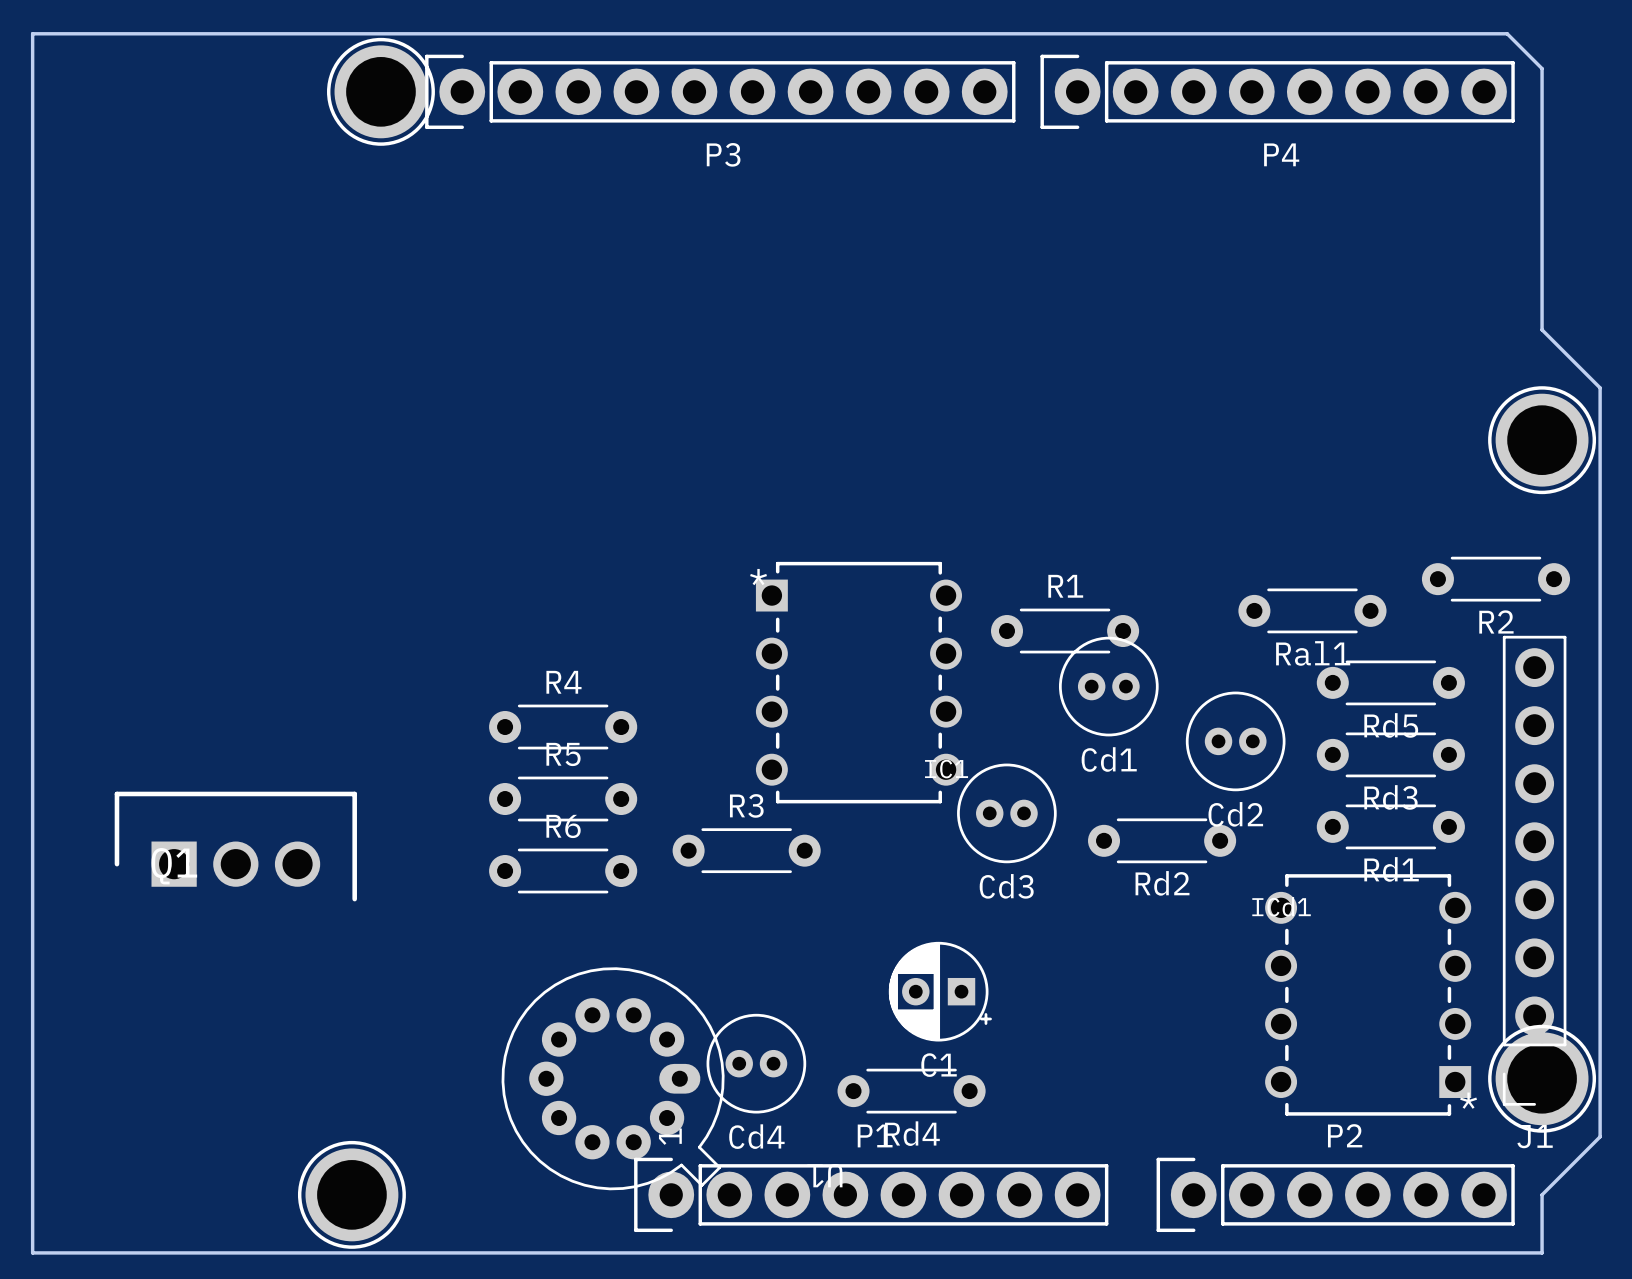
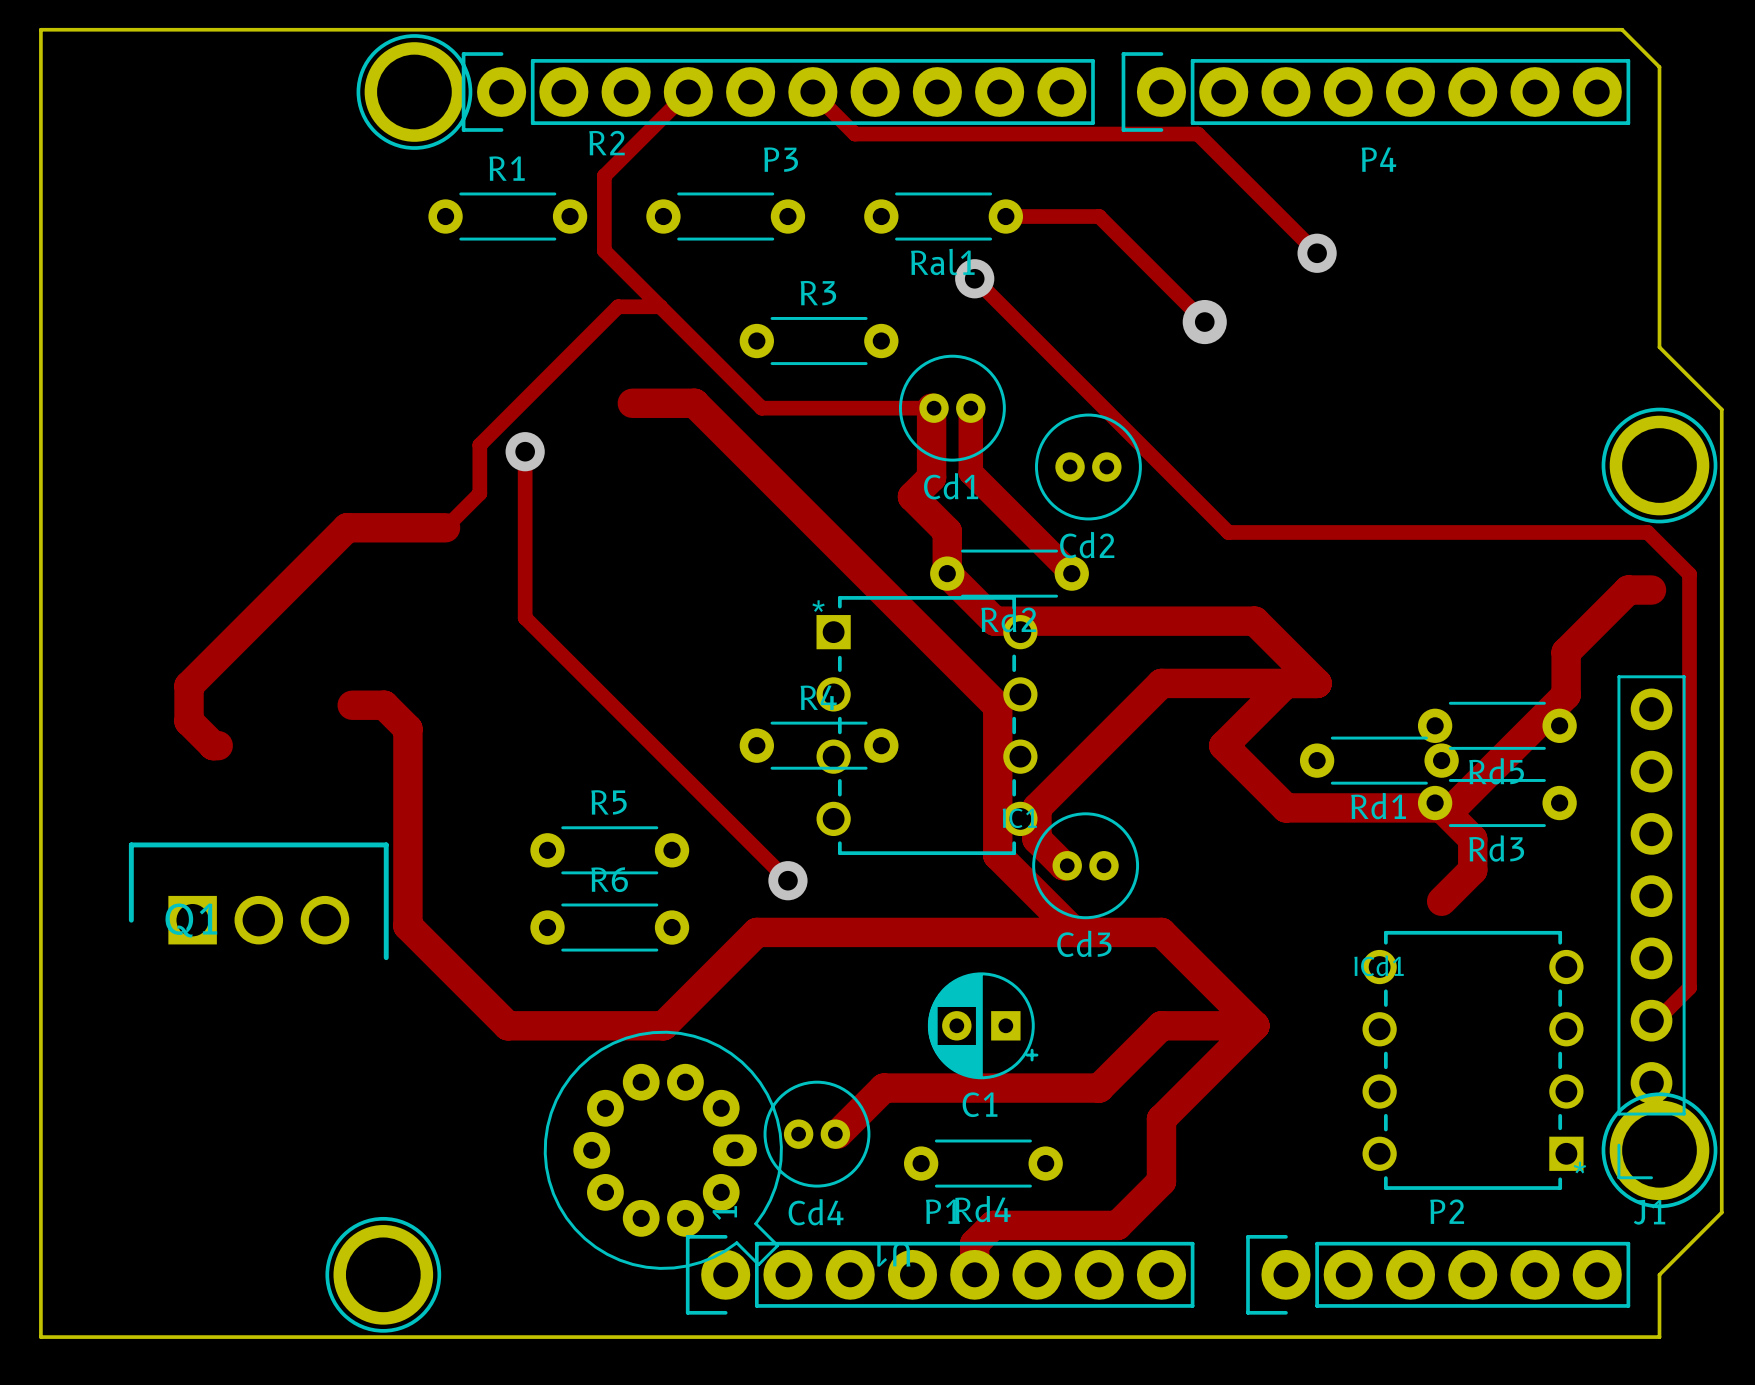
track: none -> (688, 92) (604, 175) (604, 250) (761, 408) (934, 408)
track: none -> (812, 92) (854, 134) (1197, 134) (1317, 253)
track: none -> (1005, 216) (1099, 216) (1204, 322)
via: none -> (1317, 253)
track: none -> (974, 278) (1228, 532) (1647, 532) (1689, 574) (1689, 987) (1651, 1025)
via: none -> (974, 278)
track: none -> (660, 306) (618, 306) (479, 445) (479, 493) (445, 527) (347, 527) (189, 685) (189, 721) (213, 745) (218, 745)
via: none -> (1204, 322)
track: none -> (632, 403) (694, 403) (997, 706) (997, 855) (1074, 932)
track: none -> (931, 408) (931, 477) (912, 496) (947, 531) (947, 573) (994, 621) (1254, 621) (1317, 683) (1161, 683) (1036, 807) (1036, 839) (1064, 865)
track: none -> (970, 408) (970, 472) (1071, 573)
track: none -> (525, 451) (525, 617) (787, 880)
via: none -> (525, 451)
track: none -> (1651, 590) (1628, 590) (1566, 652) (1566, 695) (1453, 807) (1285, 807) (1223, 745) (1285, 683)
R2 position: (1496, 579) -> (725, 216)
Ral1 position: (1312, 610) -> (943, 216)
R2 name position: R2 (1496, 621) -> R2 (606, 143)
R1 position: (1065, 631) -> (507, 216)
track: none -> (352, 705) (384, 705) (407, 728) (407, 925) (507, 1025) (663, 1025) (756, 932) (1161, 932) (1254, 1025)
Cd1 position: (1108, 686) -> (952, 408)
R4 position: (563, 727) -> (819, 745)
Cd2 position: (1235, 741) -> (1088, 467)
track: none -> (1441, 807) (1472, 839) (1472, 870) (1441, 901)
Rd1 position: (1390, 826) -> (1379, 760)
via: none -> (787, 880)
Rd2 position: (1162, 840) -> (1009, 573)
R3 position: (746, 850) -> (819, 341)
track: none -> (1254, 1025) (1161, 1025) (1099, 1088) (883, 1088) (837, 1134)
track: none -> (1254, 1025) (1161, 1119) (1161, 1181) (1117, 1225) (992, 1225) (974, 1243) (974, 1274)
C1 position: (940, 991) -> (983, 1025)

